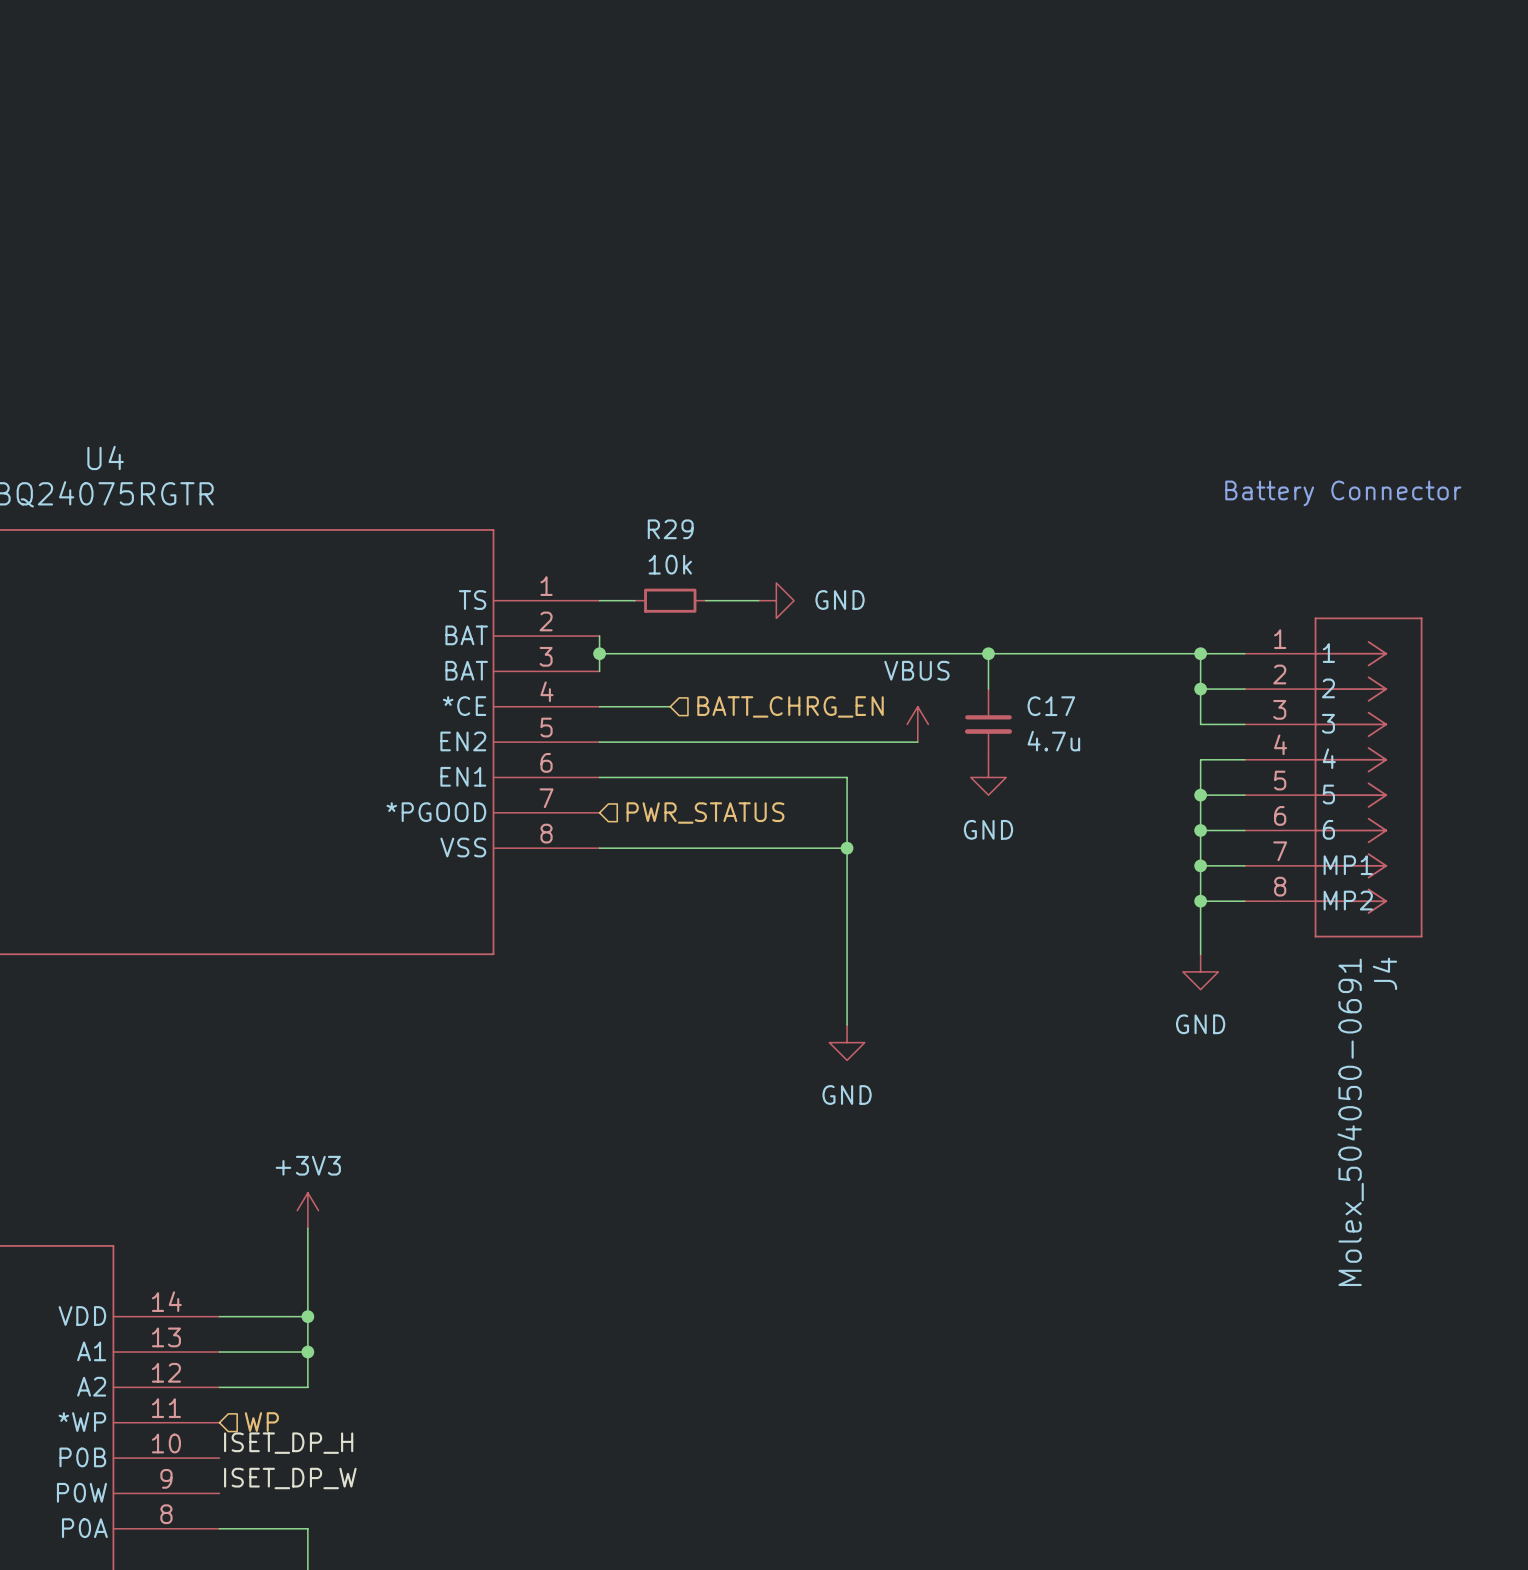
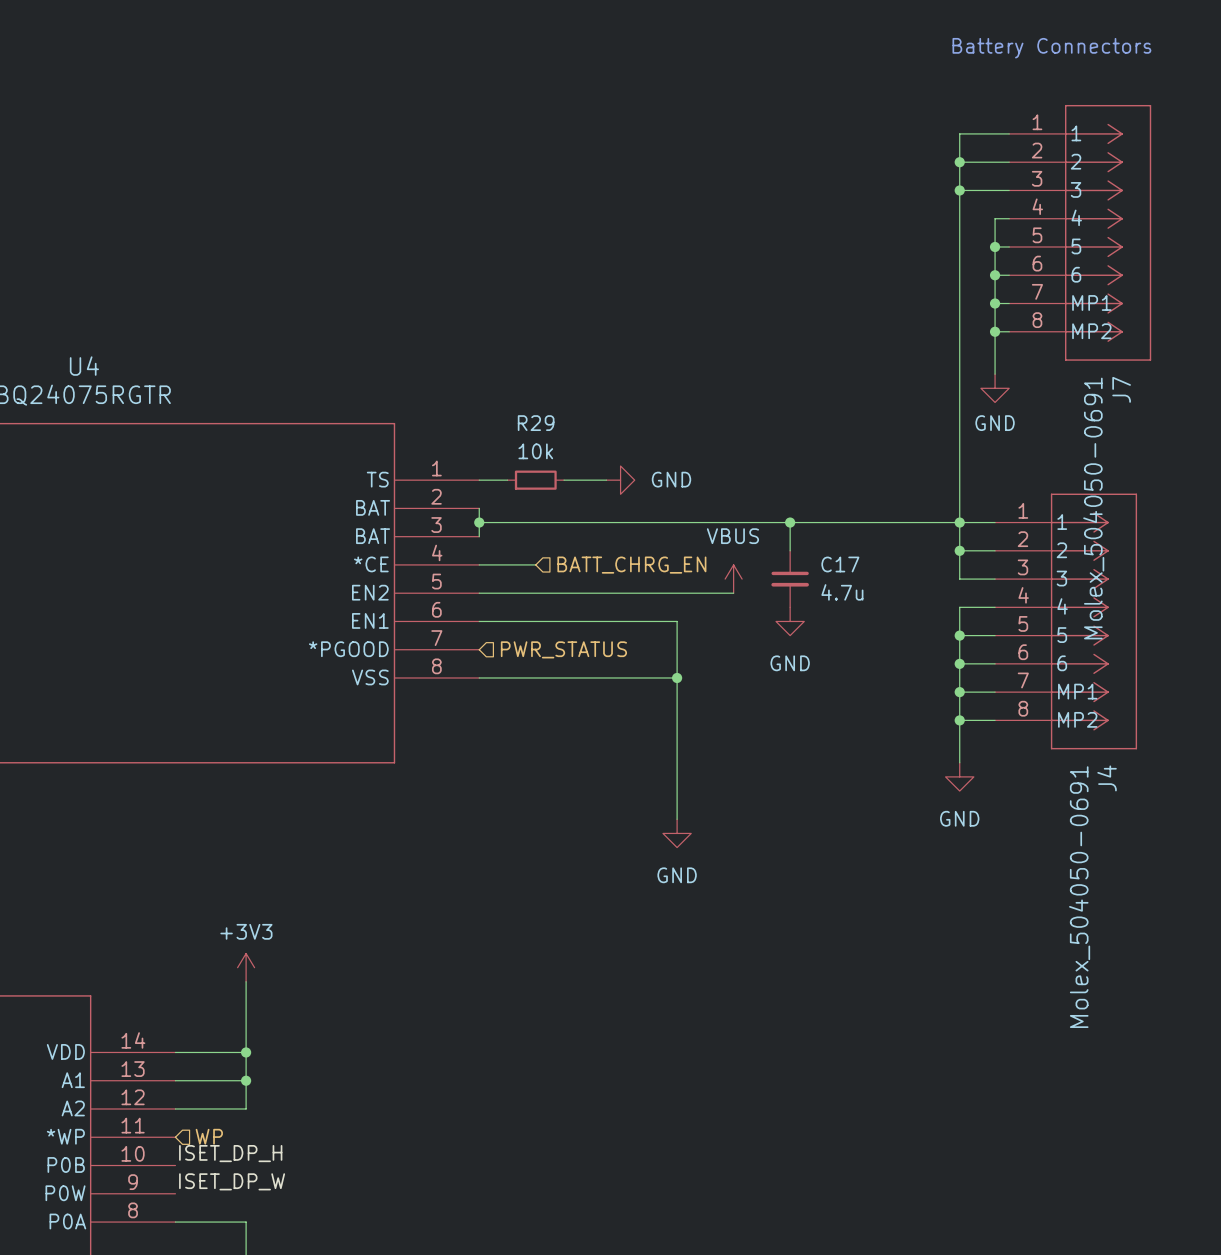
text: none -> Battery Connectors (1051, 48)
wire: none -> (1009, 133) (959, 133) (959, 522)
wire: none -> (959, 162) (1009, 162)
junction: none -> (959, 162)
wire: none -> (959, 190) (1009, 190)
junction: none -> (959, 190)
wire: none -> (1009, 218) (995, 218) (995, 374)
J7: none -> Molex_504050-0691 (1080, 232)
wire: none -> (995, 246) (1009, 246)
junction: none -> (995, 246)
wire: none -> (995, 275) (1009, 275)
junction: none -> (995, 275)
wire: none -> (995, 303) (1009, 303)
junction: none -> (995, 303)
wire: none -> (995, 331) (1009, 331)
junction: none -> (995, 331)
power symbol: none -> GND (995, 388)
text: Battery Connector (1343, 493) -> none

